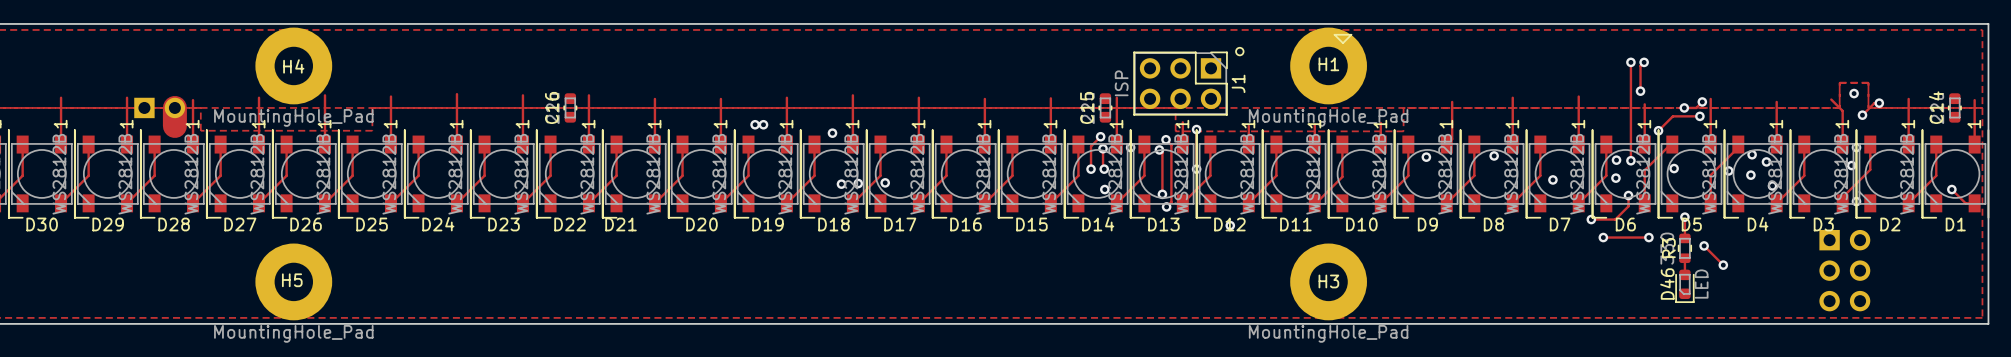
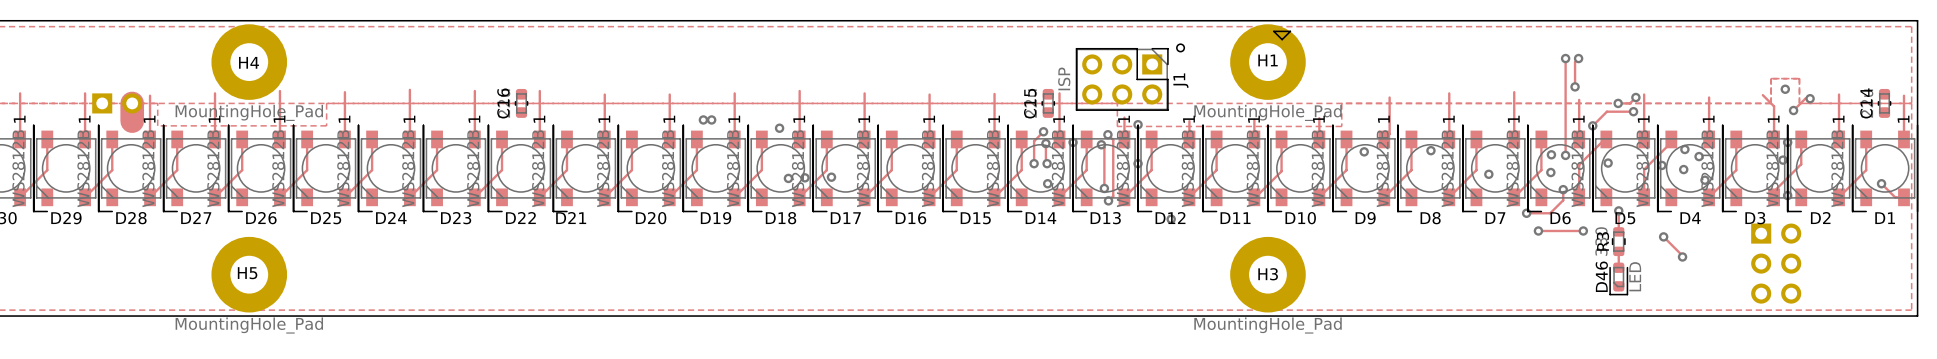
track: none -> (1663, 236) (1682, 256)
via: none -> (1663, 236)
track: (1704, 245) (1723, 265) -> none
via: (1704, 245) -> none
via: none -> (1682, 256)
via: (1723, 265) -> none

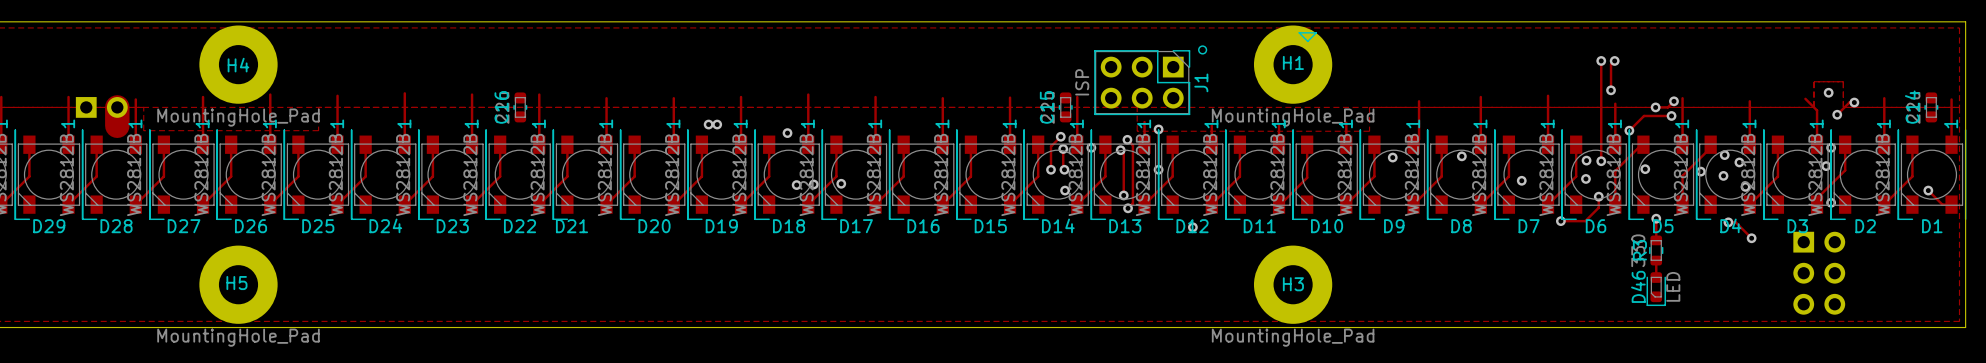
track: none -> (1728, 222) (1735, 222) (1751, 238)
via: none -> (1728, 222)
via: none -> (1751, 238)
track: (1538, 230) (1583, 230) -> none
via: (1538, 230) -> none
via: (1583, 230) -> none
track: (1663, 236) (1682, 256) -> none
via: (1663, 236) -> none
via: (1682, 256) -> none

